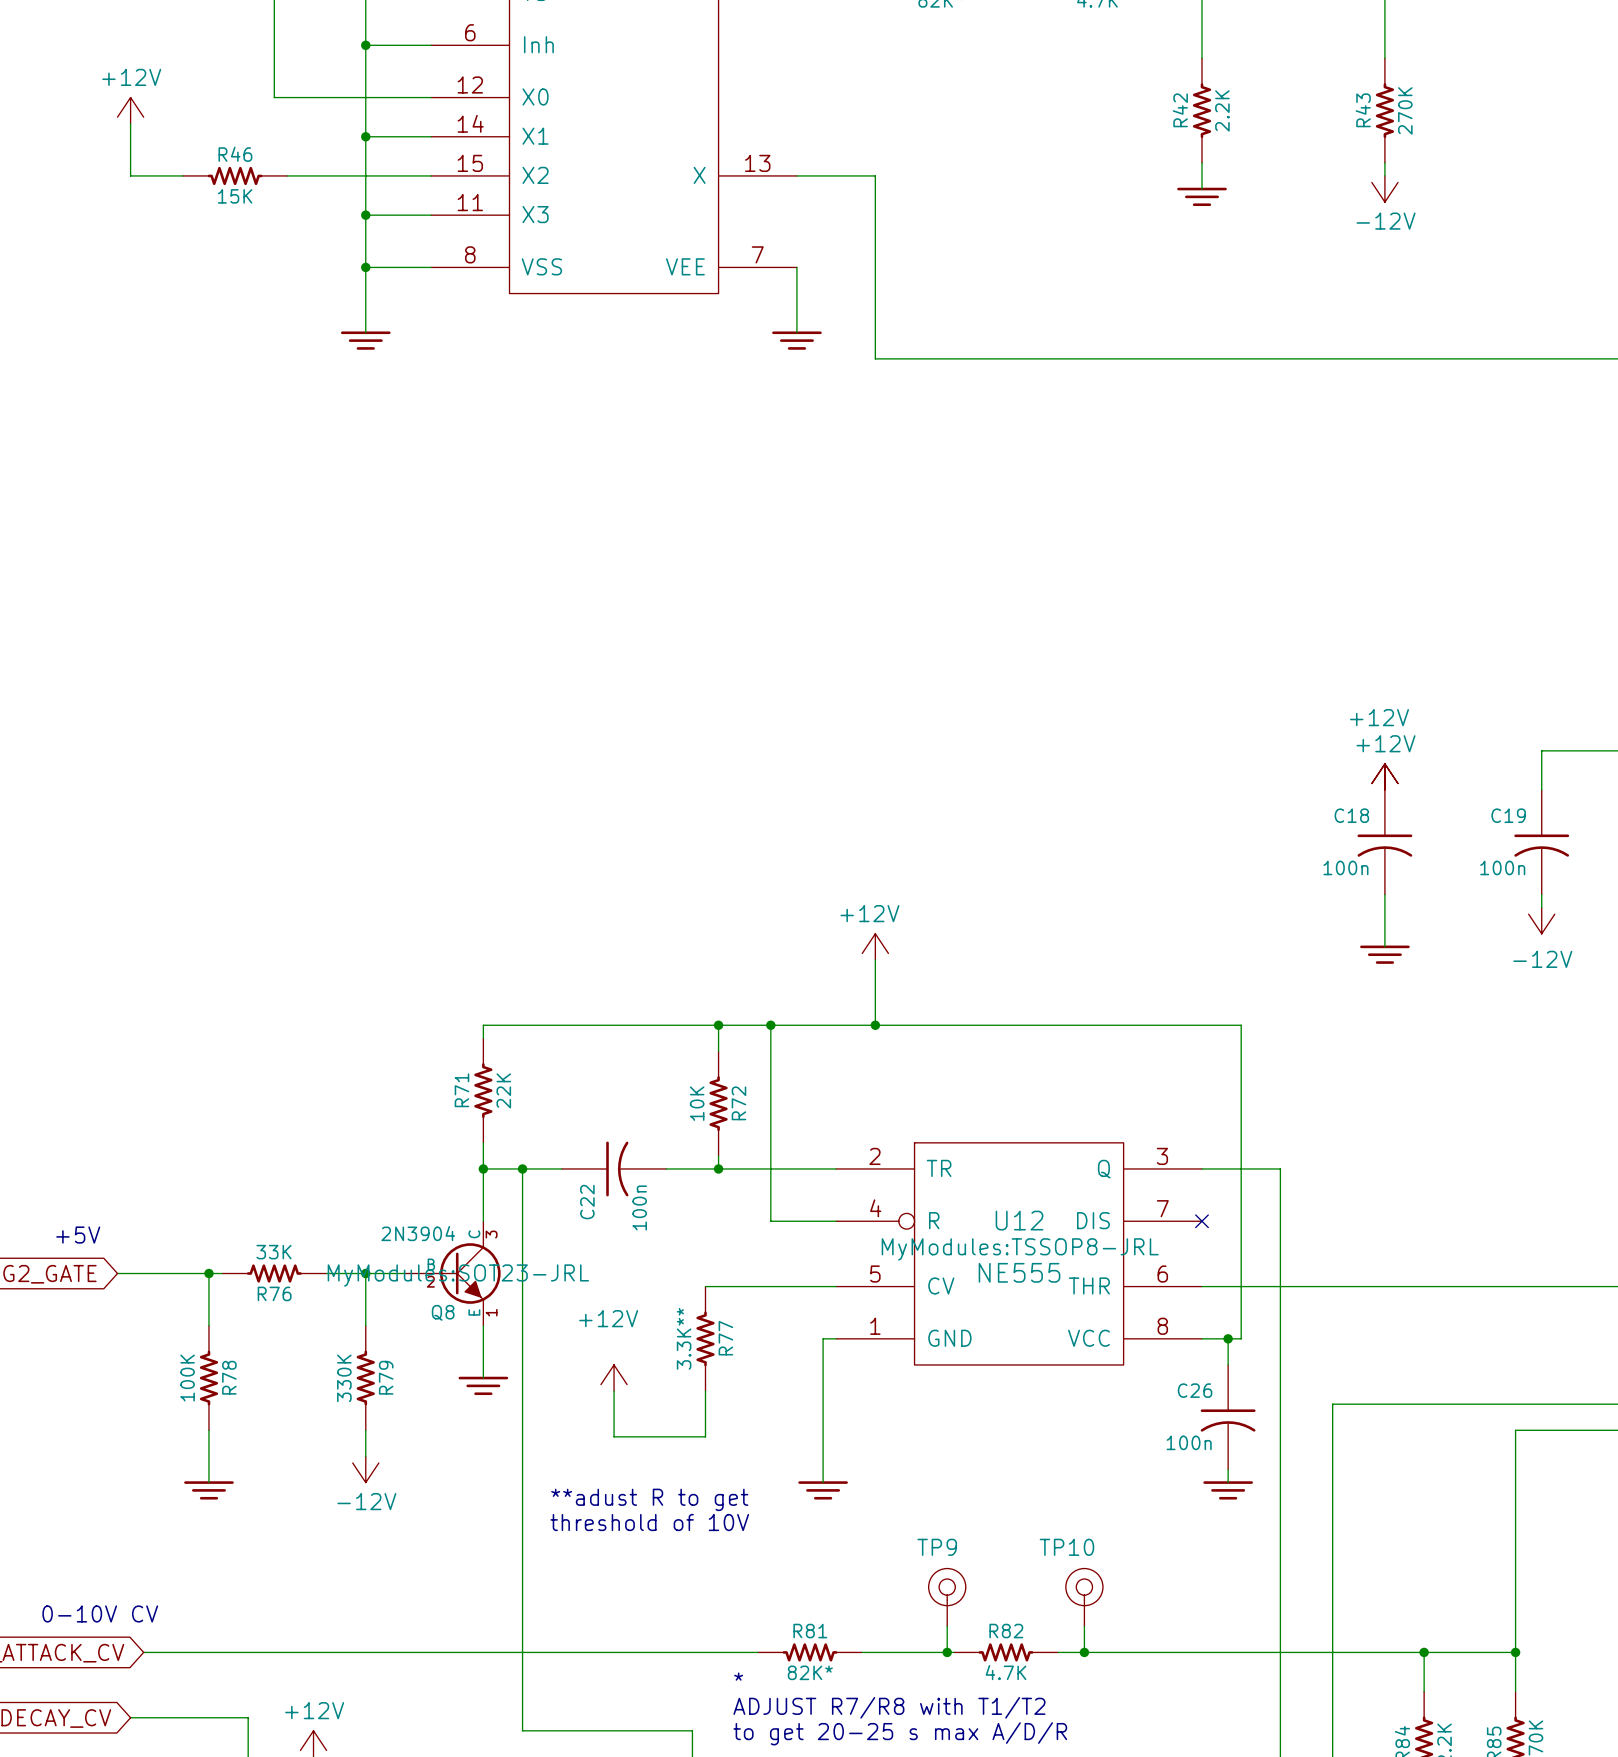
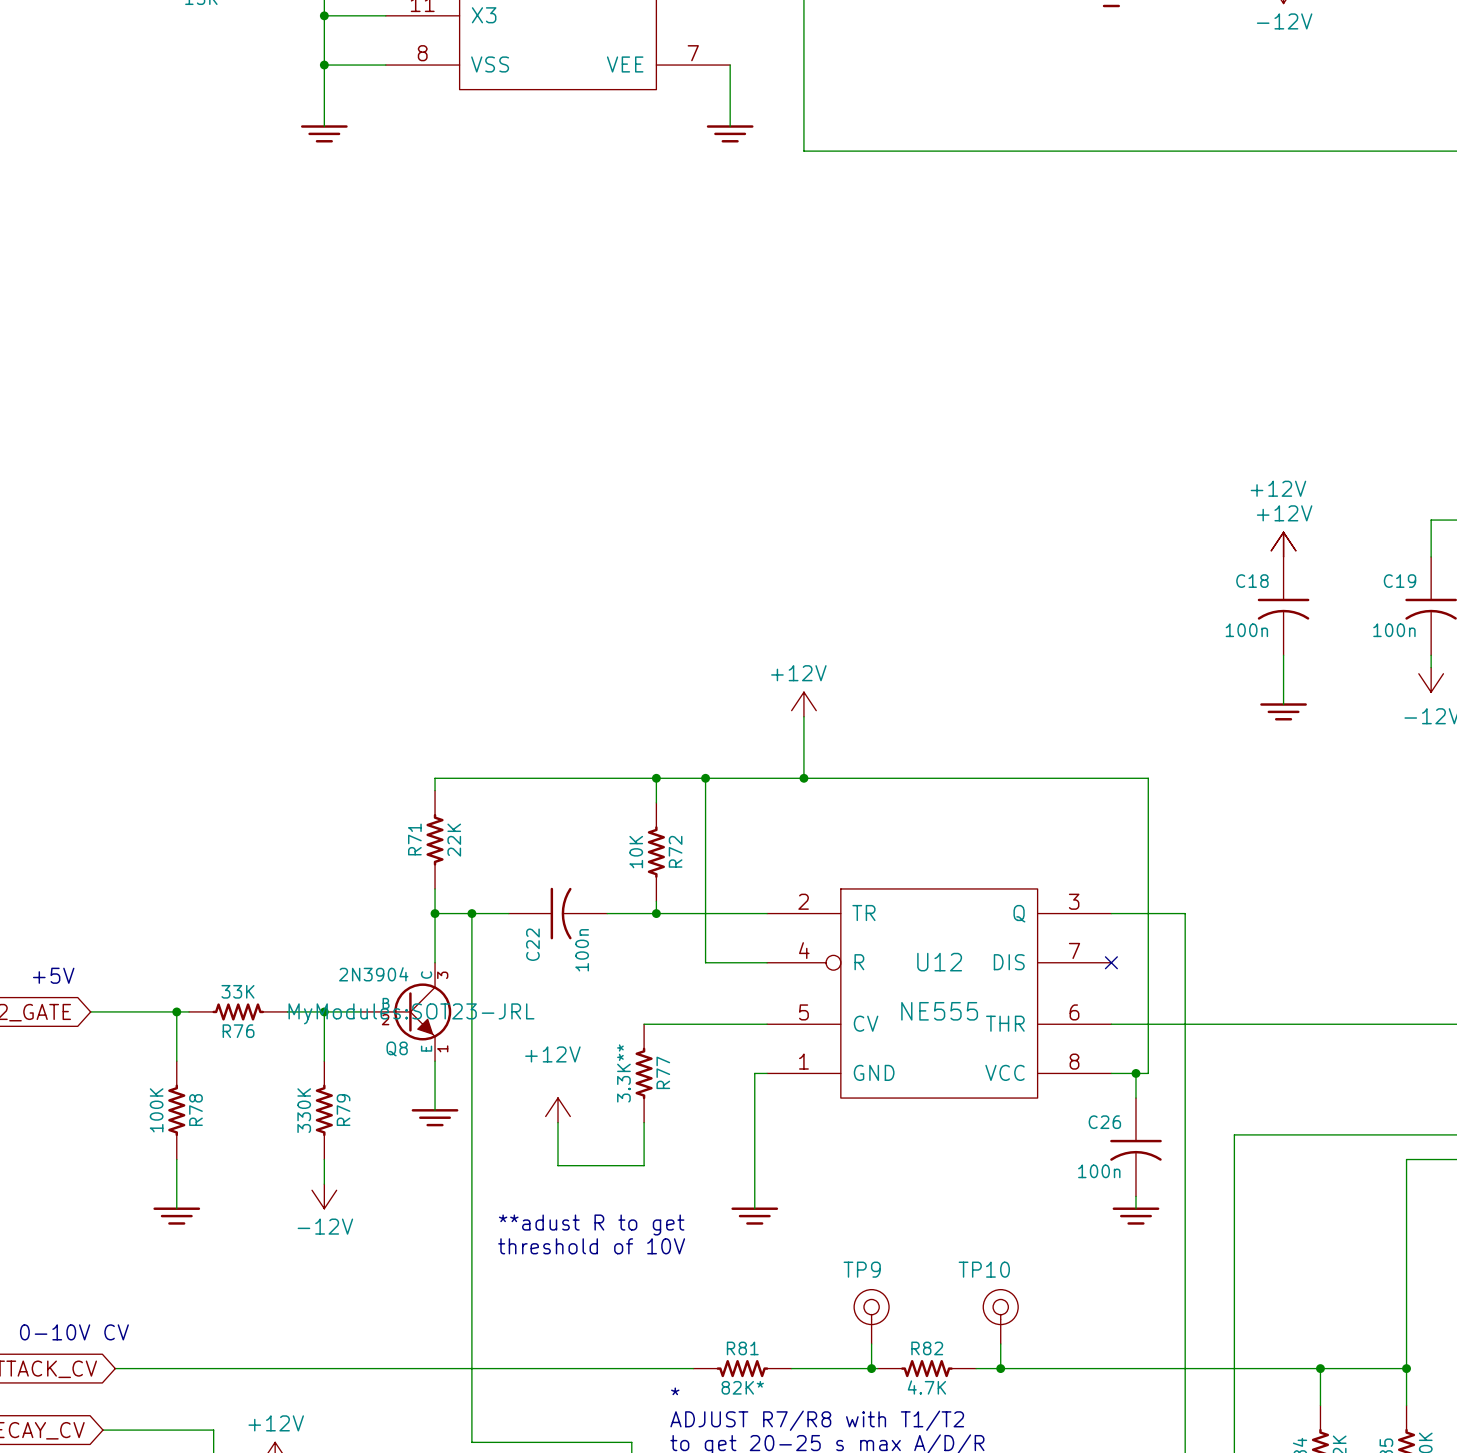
U12 text: MyModules:TSSOP8-JRL (1020, 1249) -> none

